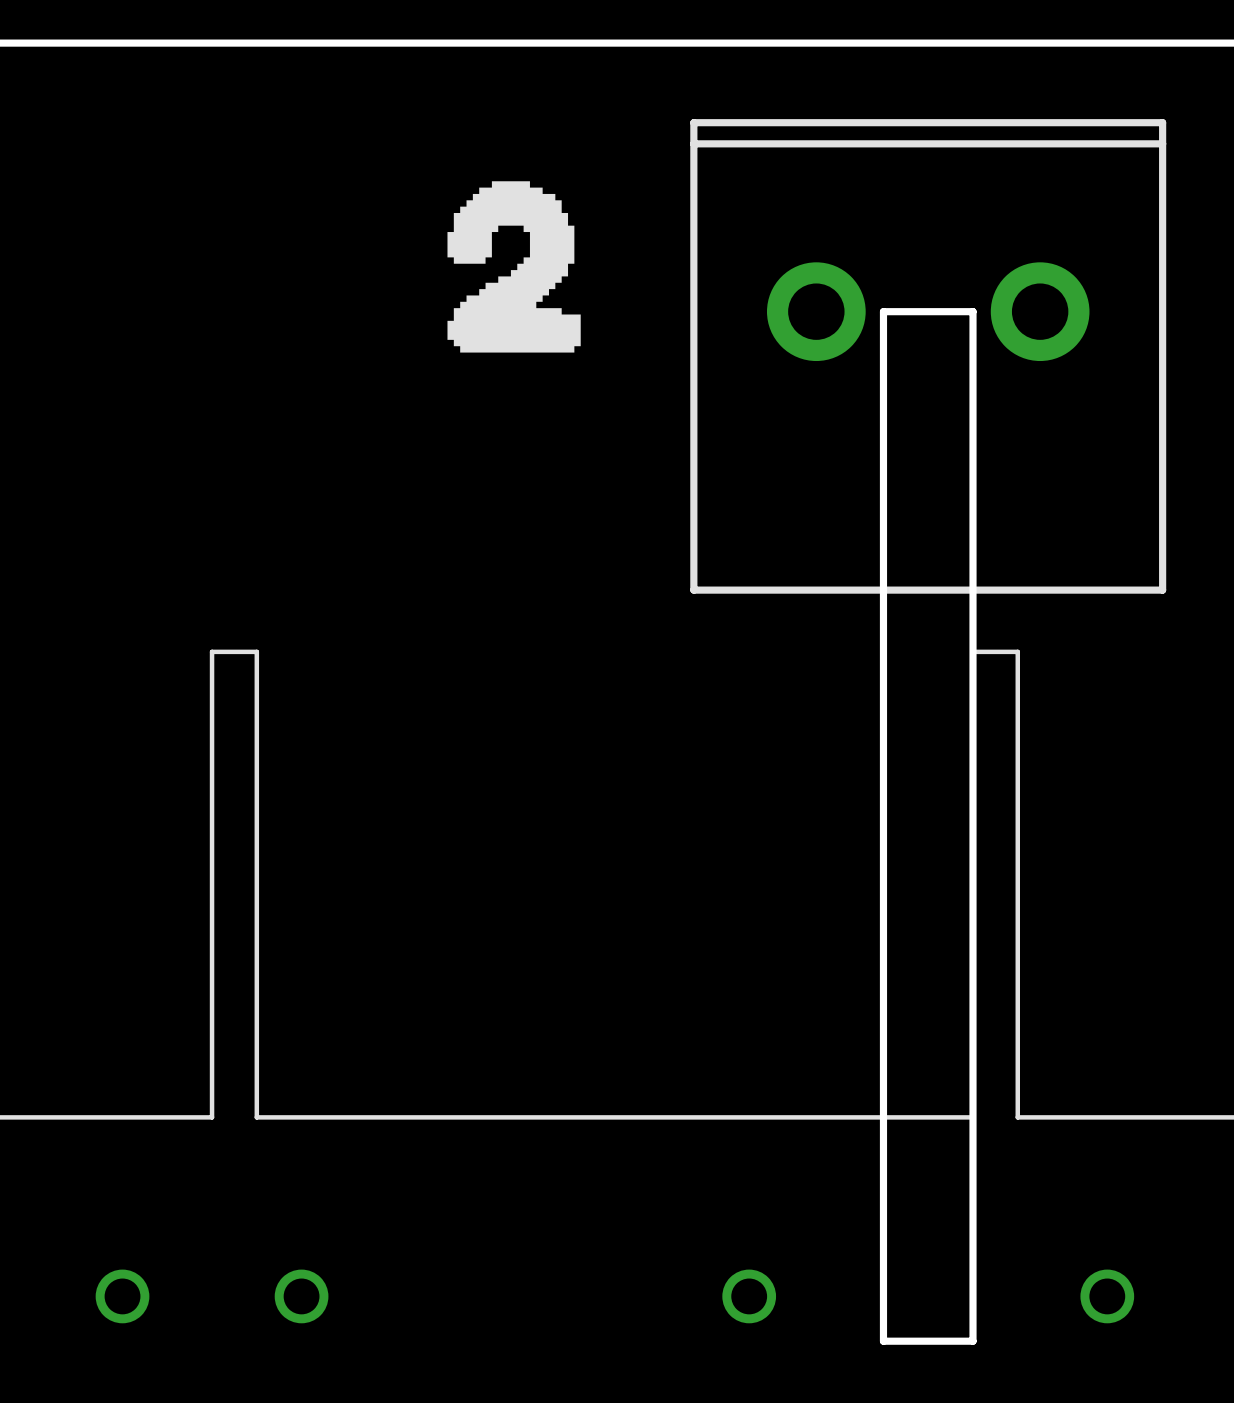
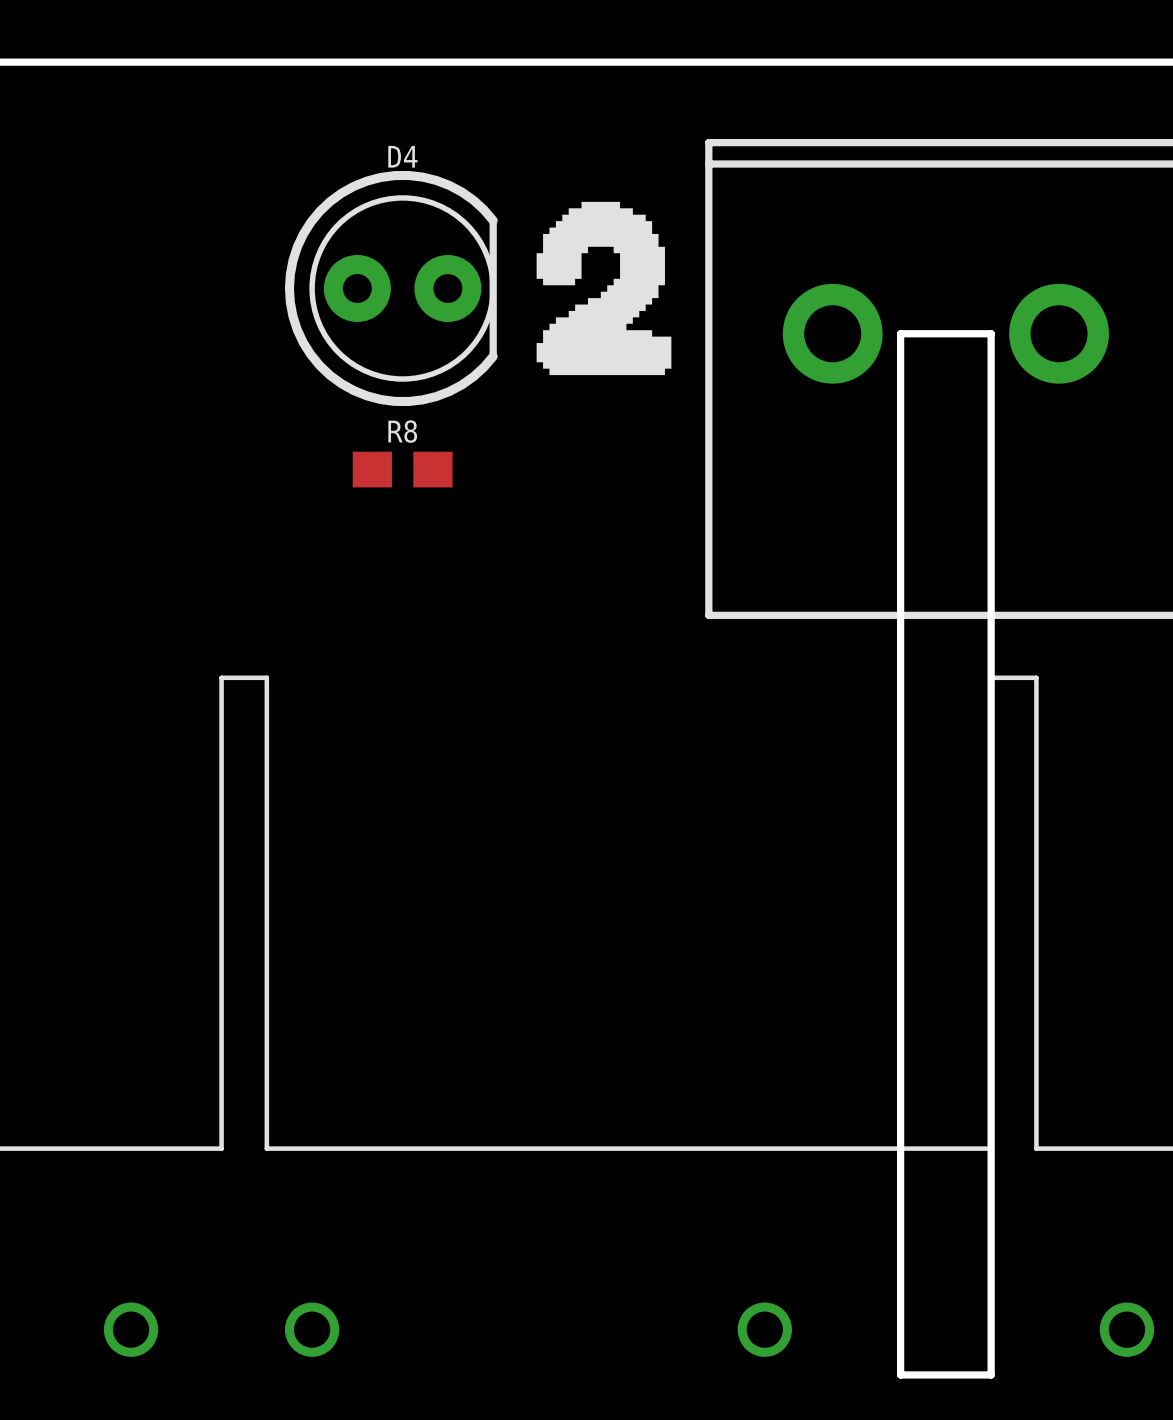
D4: none -> (391, 288)
drawing position: (514, 266) -> (604, 288)
R8: none -> (402, 469)

